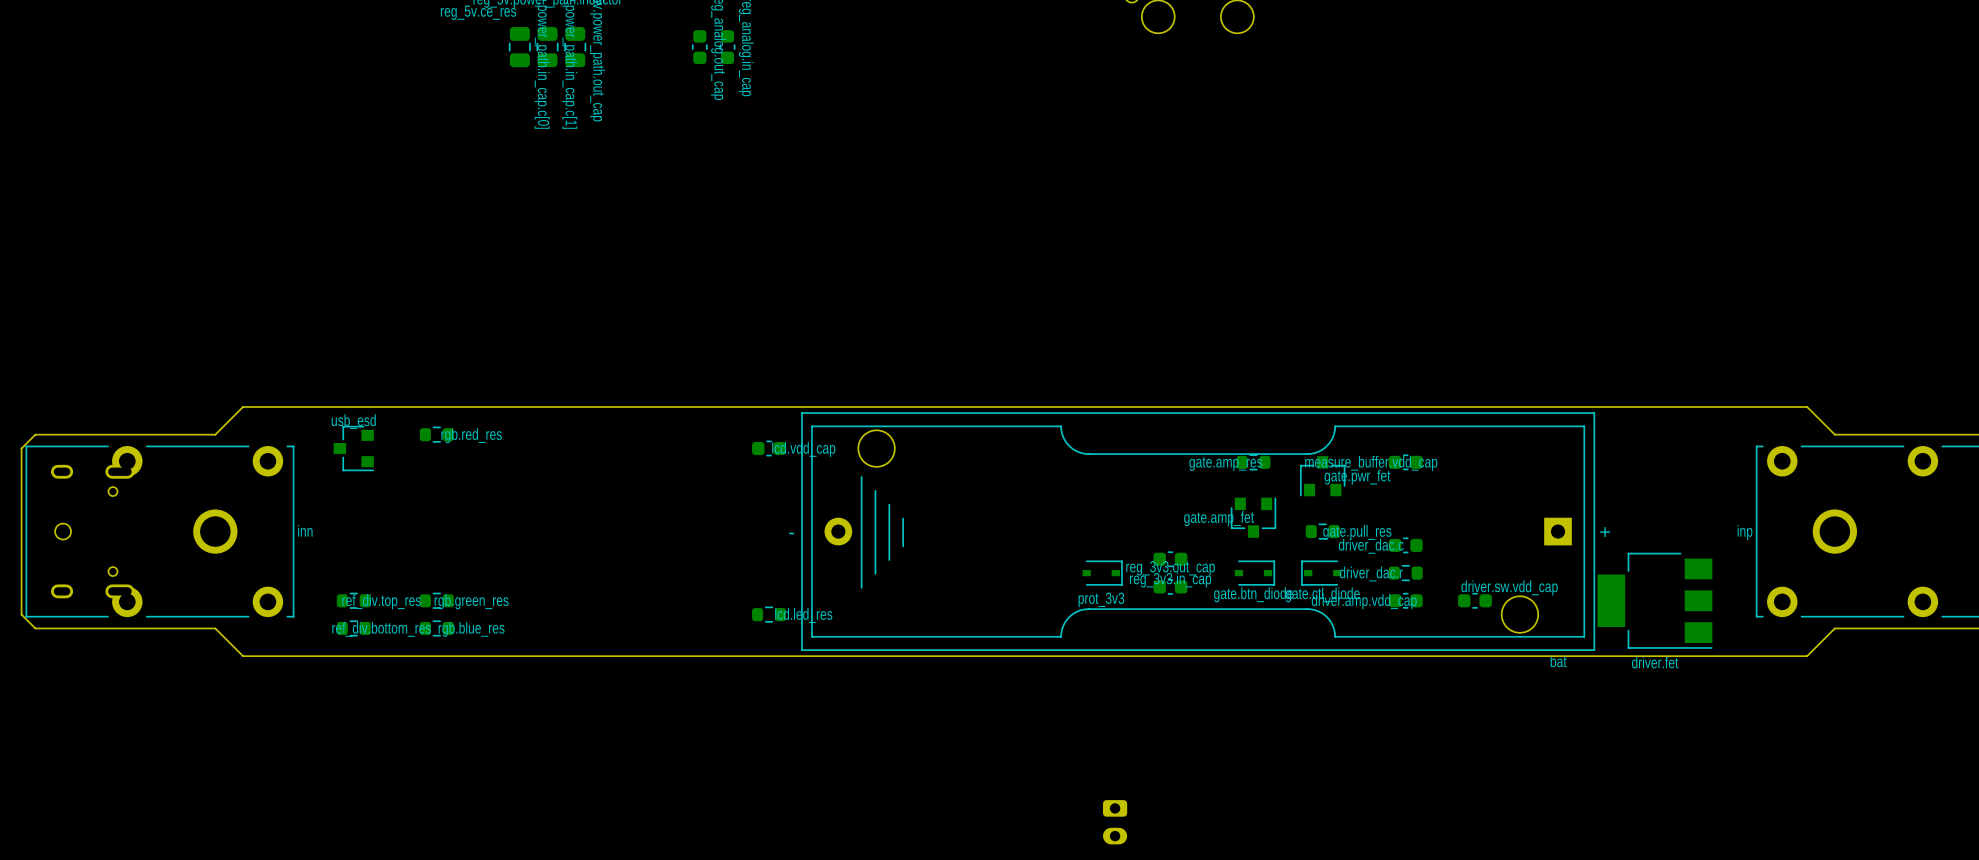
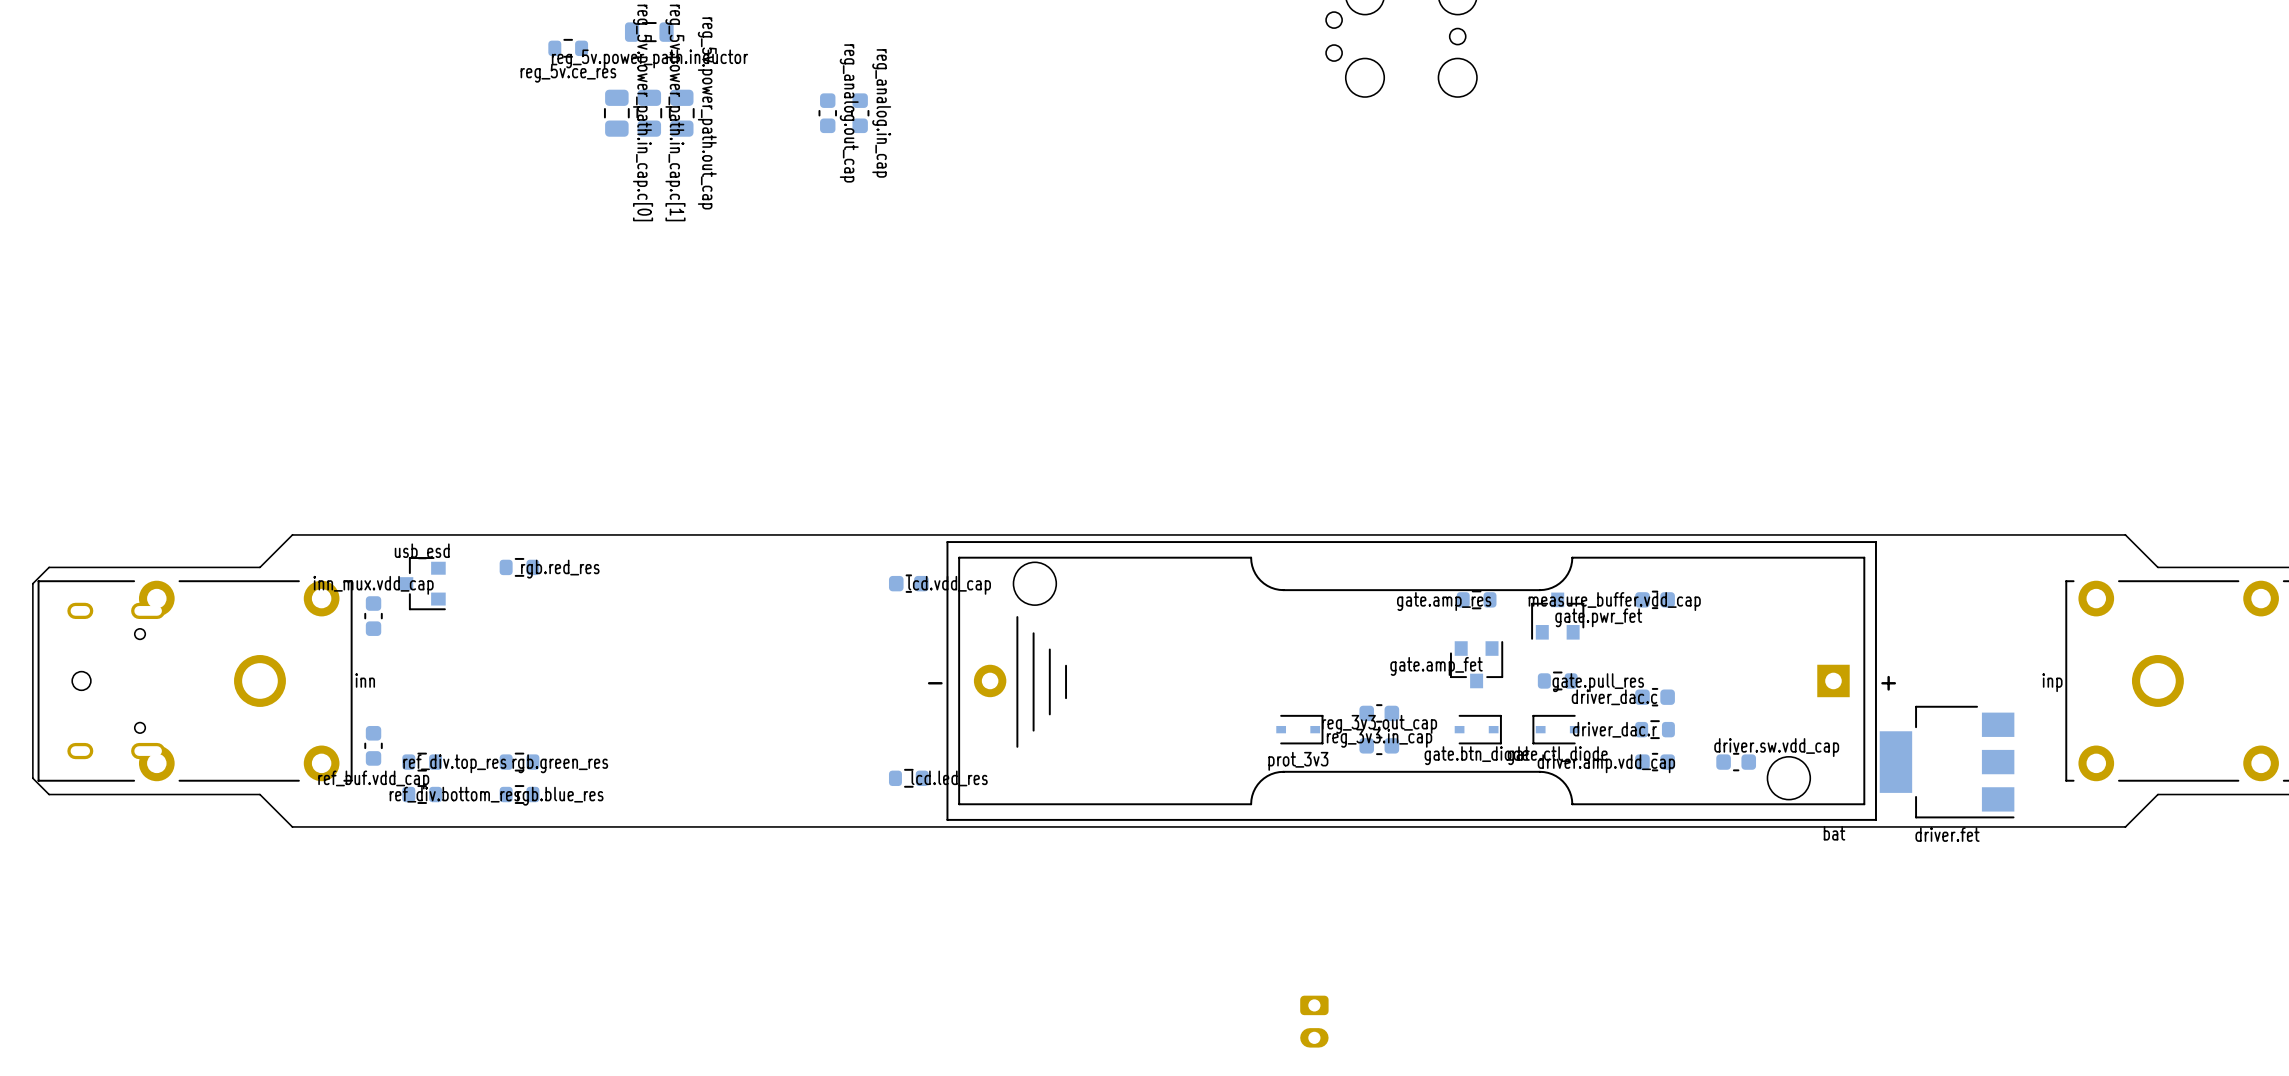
inn_mux.vdd_cap: none -> (373, 616)
ref_buf.vdd_cap: none -> (373, 745)

